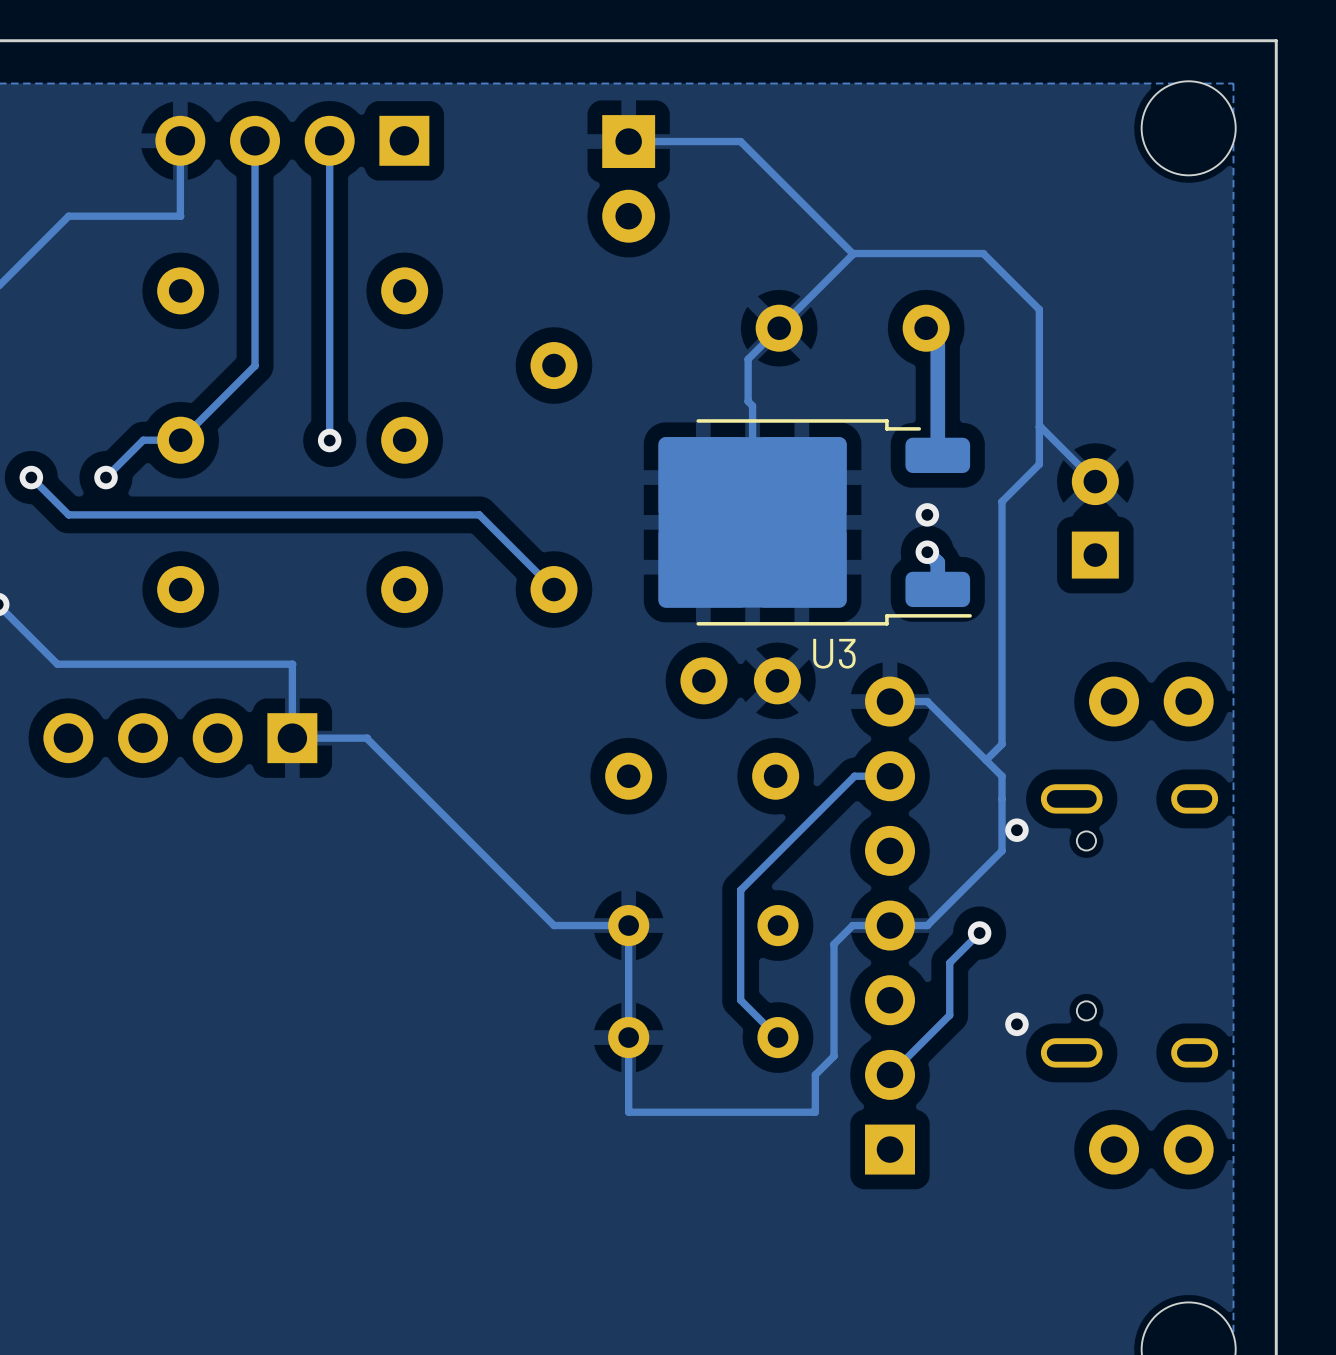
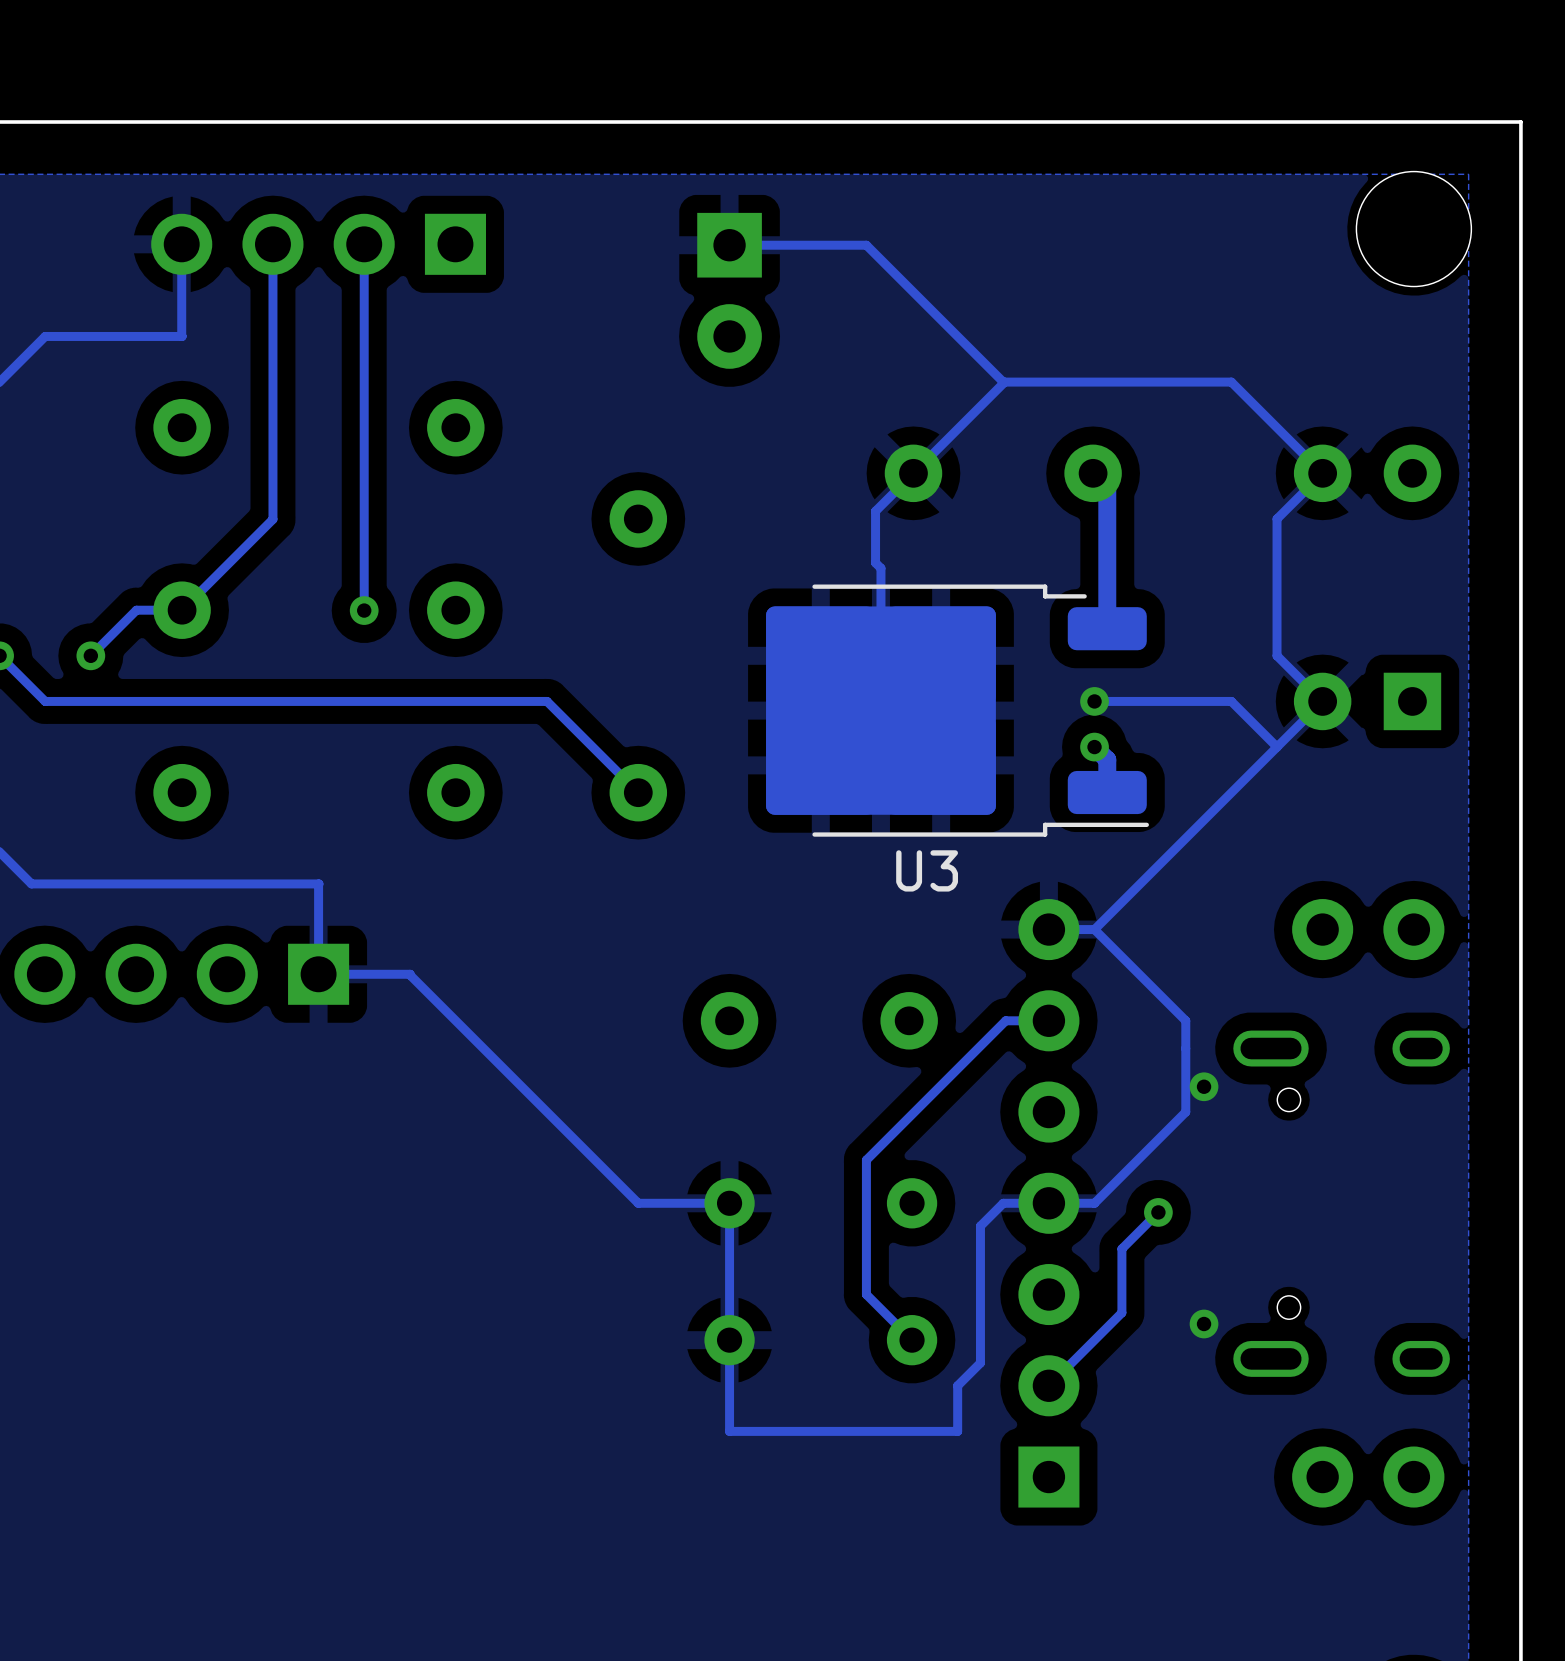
track: (983, 253) (1039, 309) (1039, 464) (1002, 501) (1002, 744) (986, 760) -> (1162, 382) (1231, 382) (1322, 473) (1277, 518) (1277, 655) (1322, 701) (1094, 929)
track: (1039, 426) (1095, 481) -> none
track: none -> (1094, 701) (1231, 701) (1277, 747)
part rotation: 0° (1095, 518) -> 90° counterclockwise (1367, 701)
U3 name position: U3 (834, 653) -> U3 (927, 870)
part position: (740, 680) -> (1367, 473)

